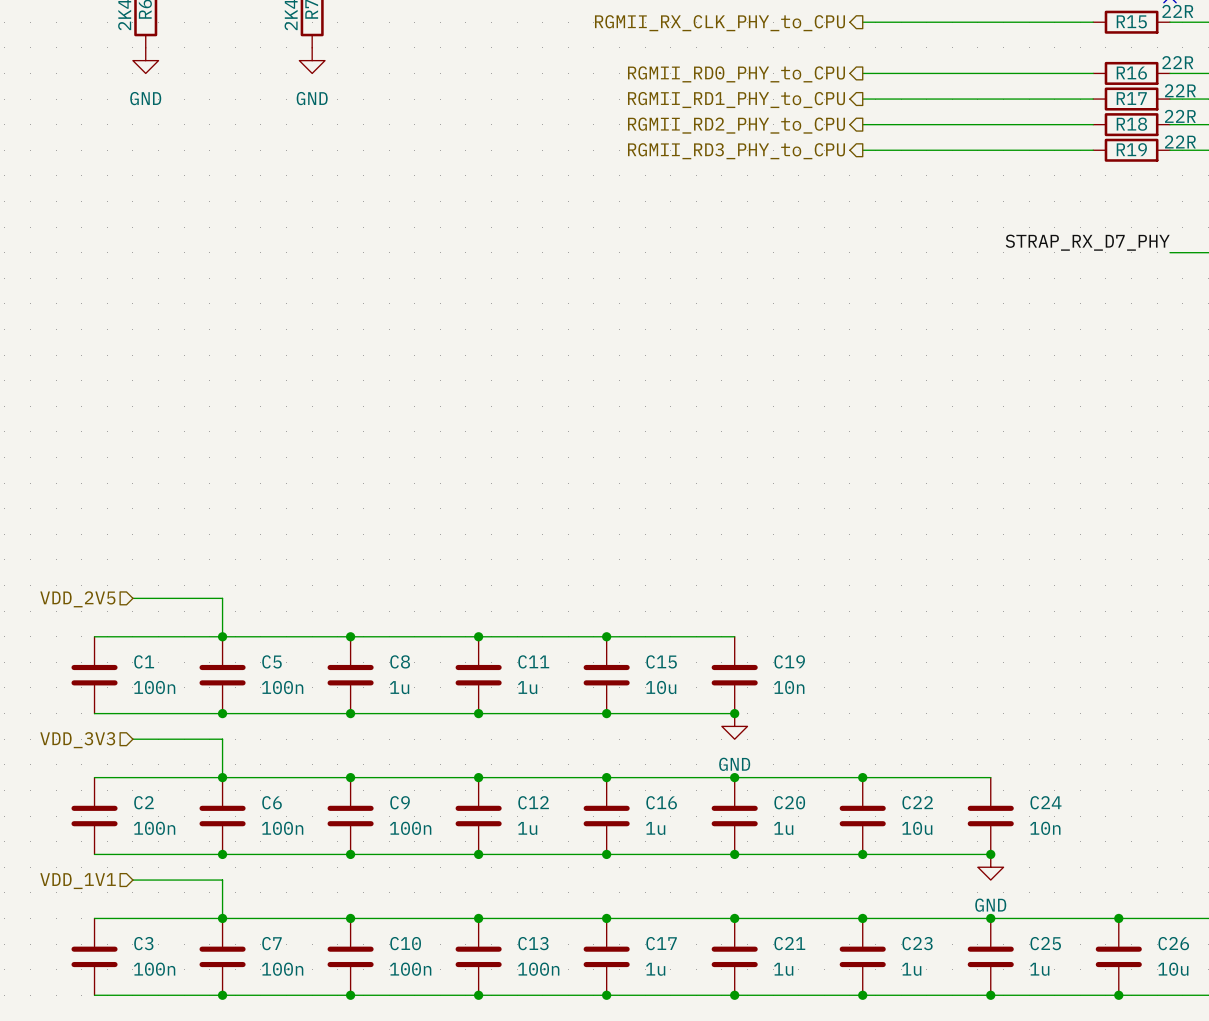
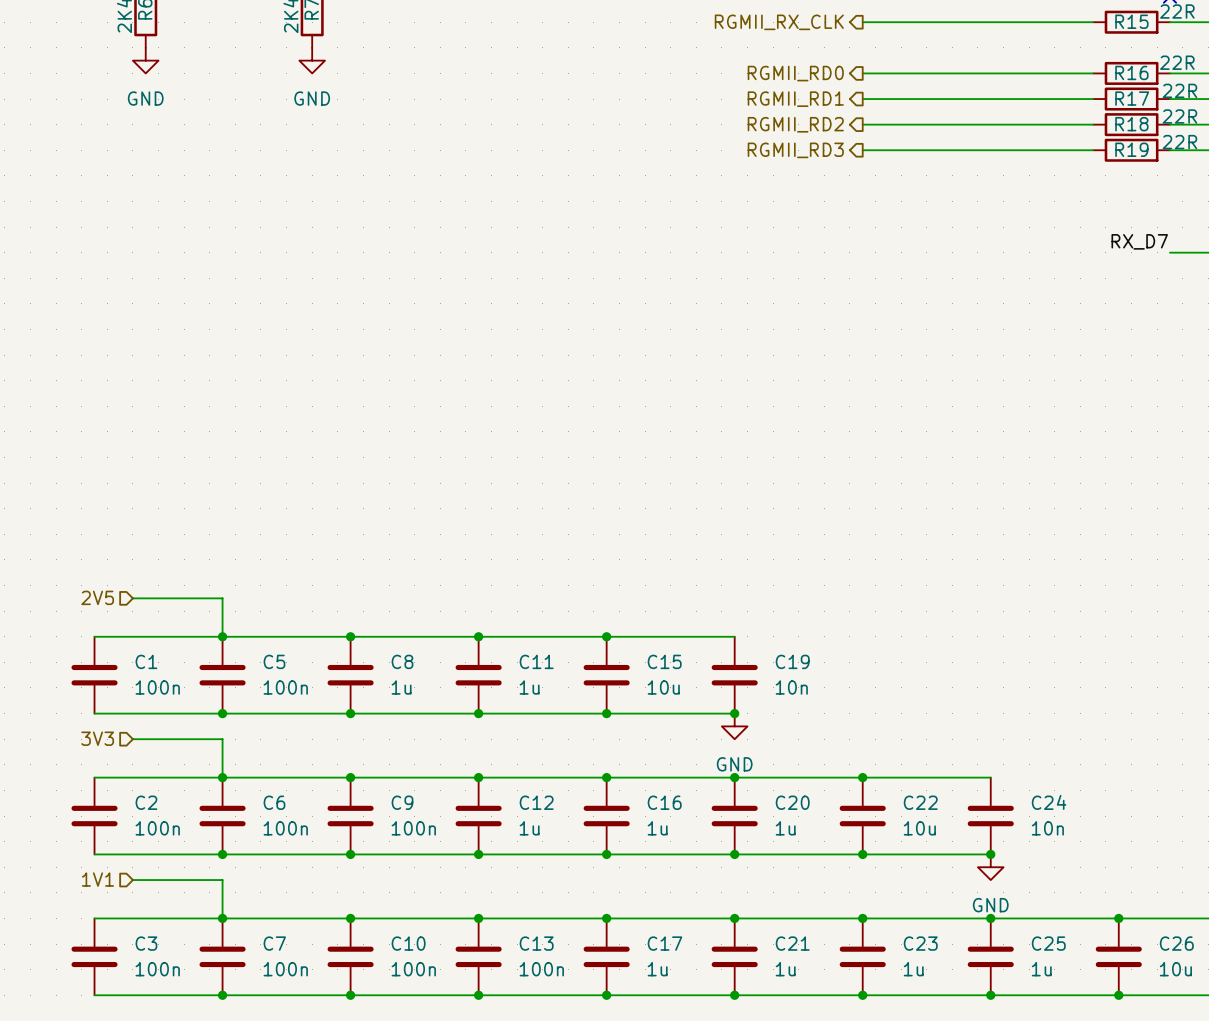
hierarchical label: RGMII_RX_CLK_PHY_to_CPU (719, 23) -> RGMII_RX_CLK (779, 22)
hierarchical label: RGMII_RD0_PHY_to_CPU (736, 74) -> RGMII_RD0 (795, 73)
hierarchical label: RGMII_RD1_PHY_to_CPU (736, 100) -> RGMII_RD1 (795, 99)
hierarchical label: RGMII_RD2_PHY_to_CPU (736, 125) -> RGMII_RD2 (795, 124)
hierarchical label: RGMII_RD3_PHY_to_CPU (736, 151) -> RGMII_RD3 (795, 150)
label: STRAP_RX_D7_PHY (1087, 242) -> RX_D7 (1139, 241)
hierarchical label: VDD_2V5 (77, 599) -> 2V5 (97, 597)
hierarchical label: VDD_3V3 (77, 740) -> 3V3 (97, 738)
hierarchical label: VDD_1V1 (78, 881) -> 1V1 (97, 879)

